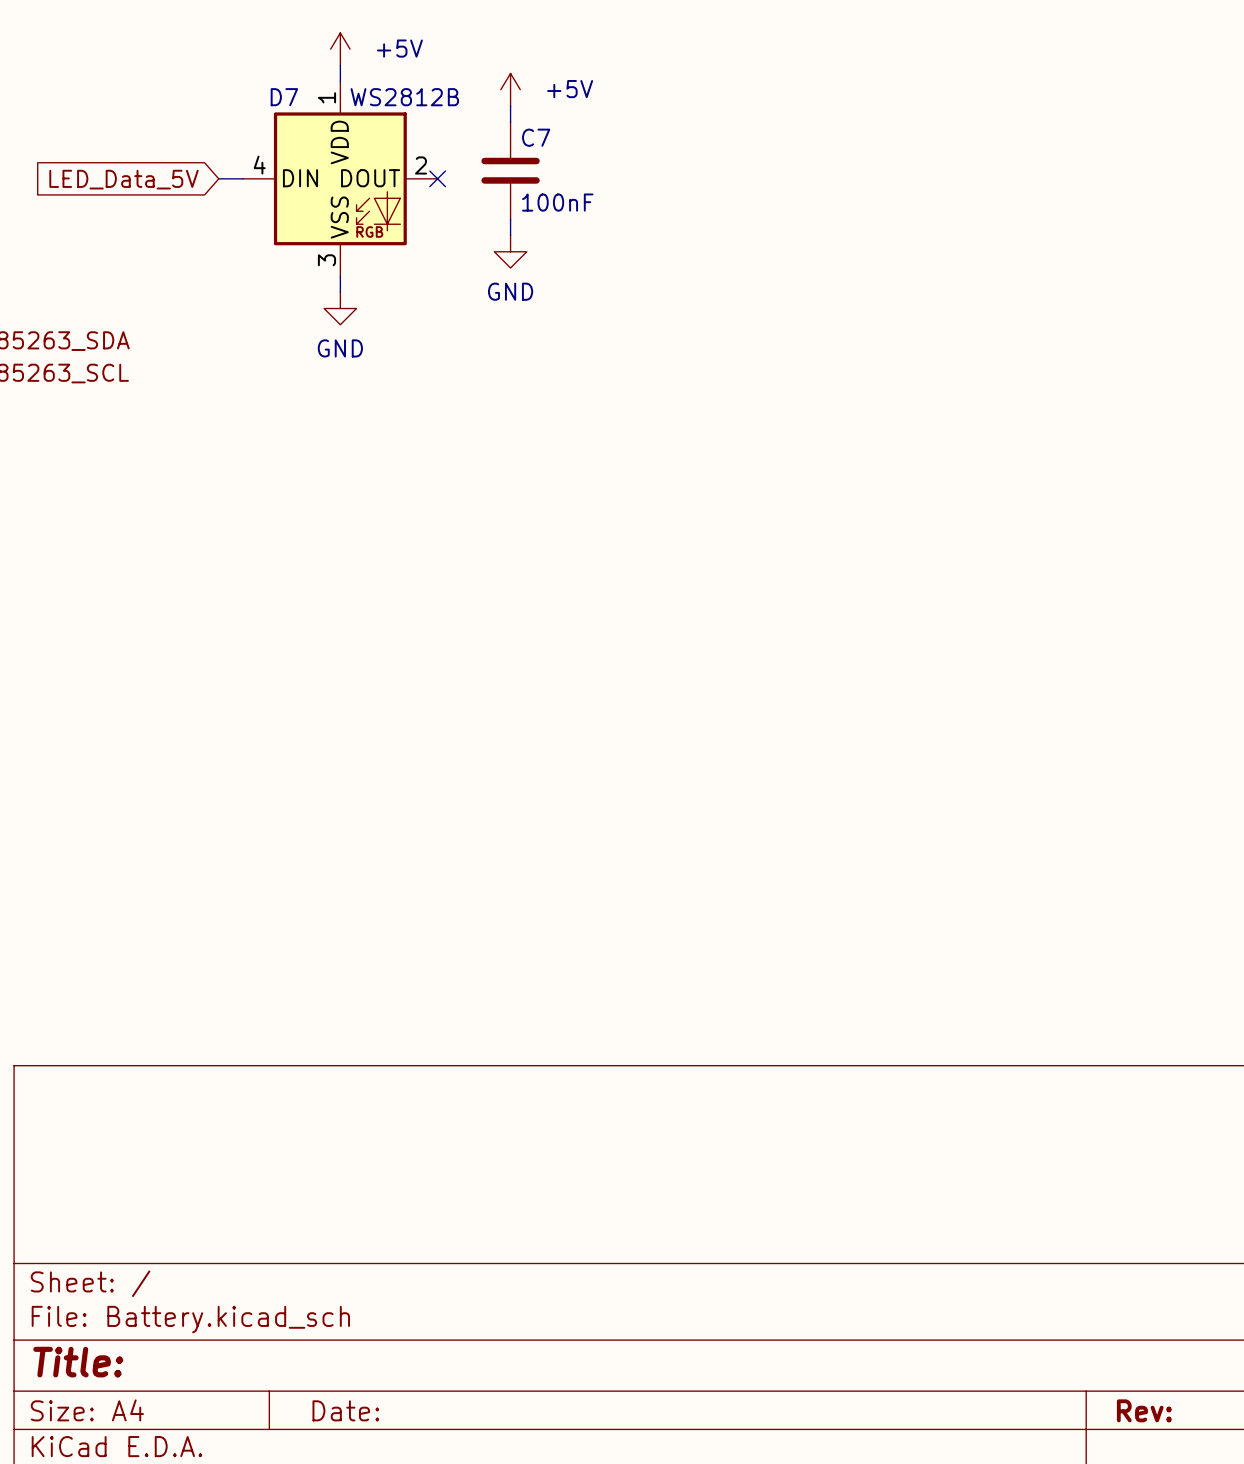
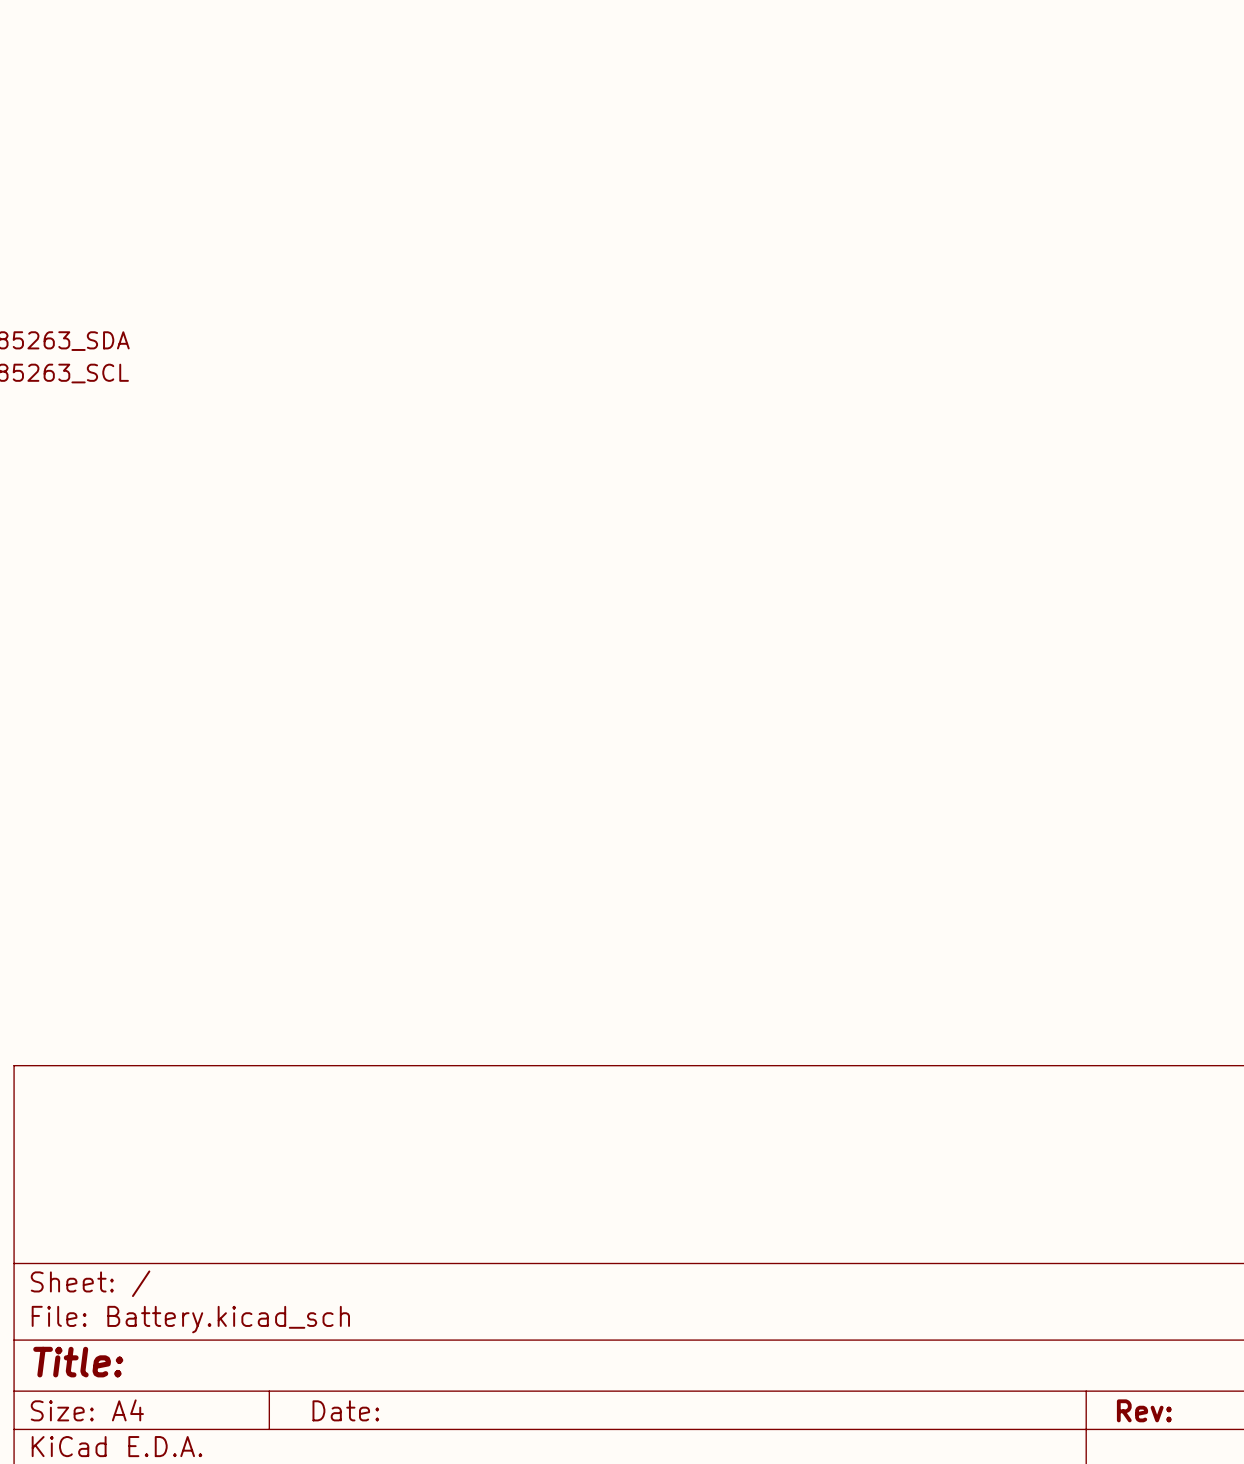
power symbol: +5V (340, 49) -> none
wire: (340, 65) (340, 81) -> none
power symbol: +5V (510, 89) -> none
wire: (510, 105) (510, 122) -> none
C7: 100nF (510, 170) -> none
wire: (218, 178) (243, 178) -> none
D7: WS2812B (340, 178) -> none
no-connect mark: (437, 178) -> none
global label: LED_Data_5V (124, 179) -> none
wire: (510, 219) (510, 235) -> none
power symbol: GND (510, 251) -> none
wire: (340, 276) (340, 292) -> none
power symbol: GND (340, 308) -> none

